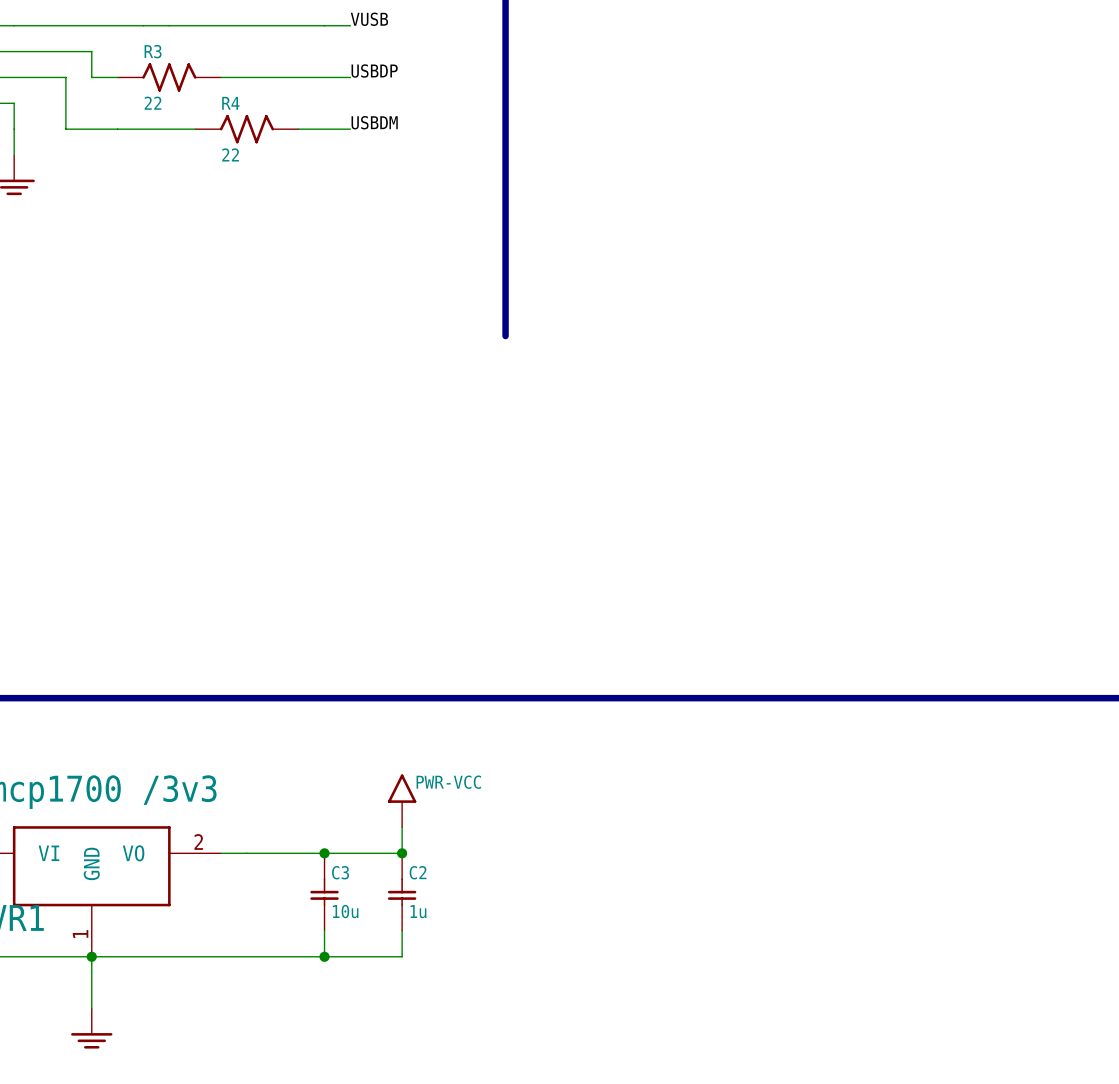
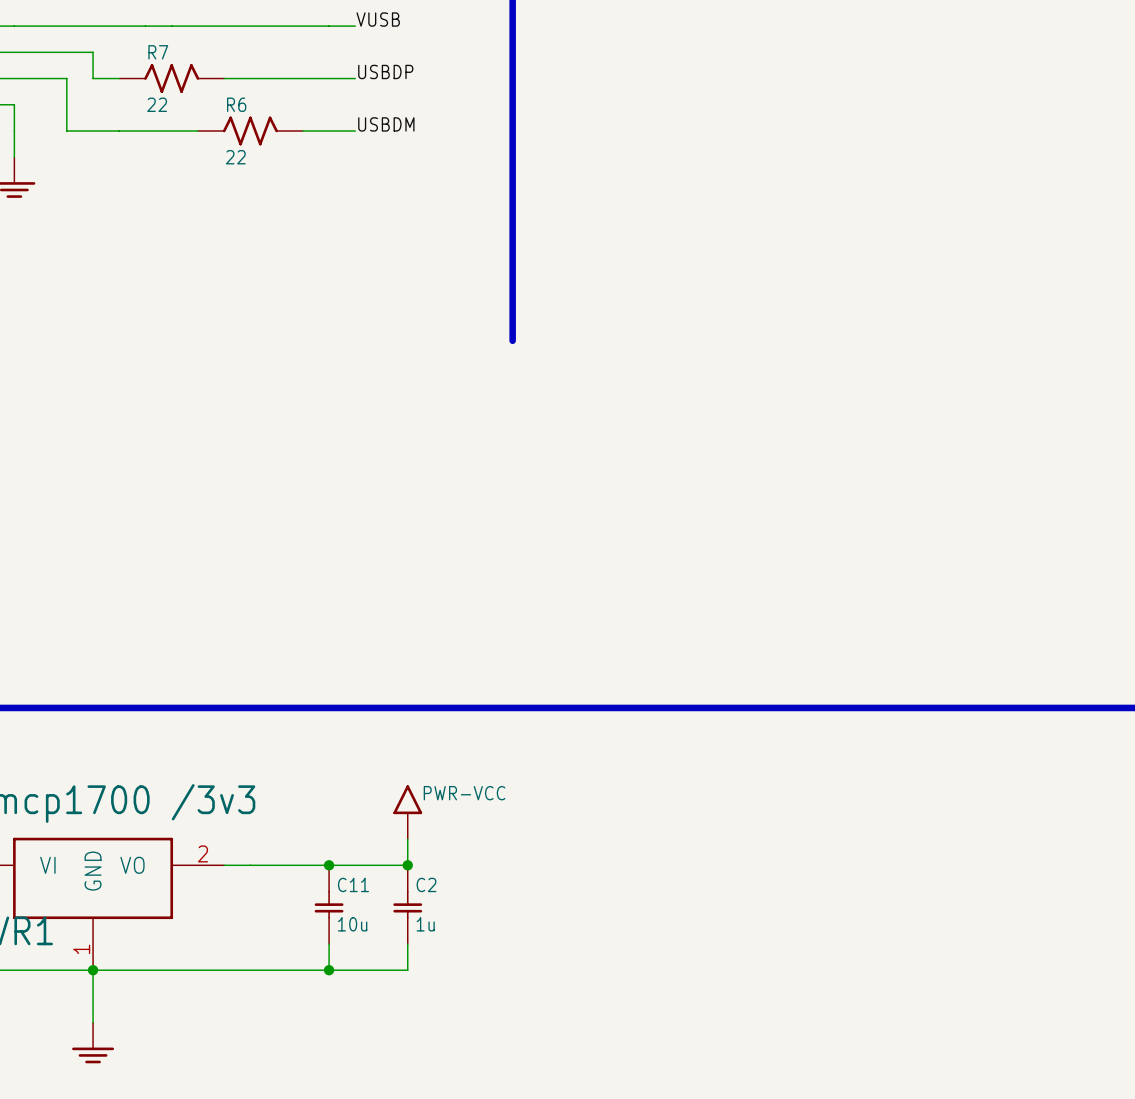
R3 name: R3 (153, 51) -> R7 (158, 52)
R4 name: R4 (230, 103) -> R6 (236, 104)
C3 name: C3 (340, 872) -> C11 (353, 884)

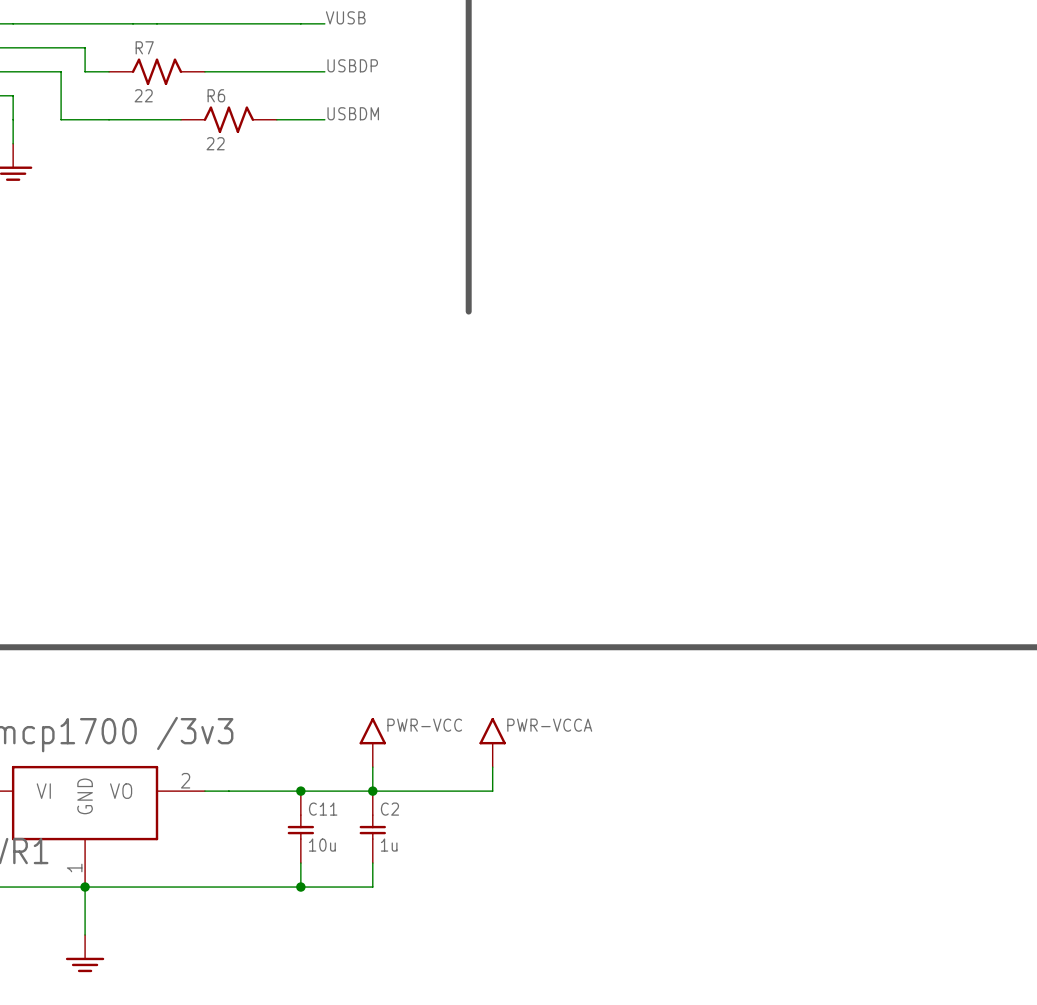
power symbol: none -> PWR-VCCA (492, 742)
wire: none -> (492, 767) (492, 791) (372, 791)

